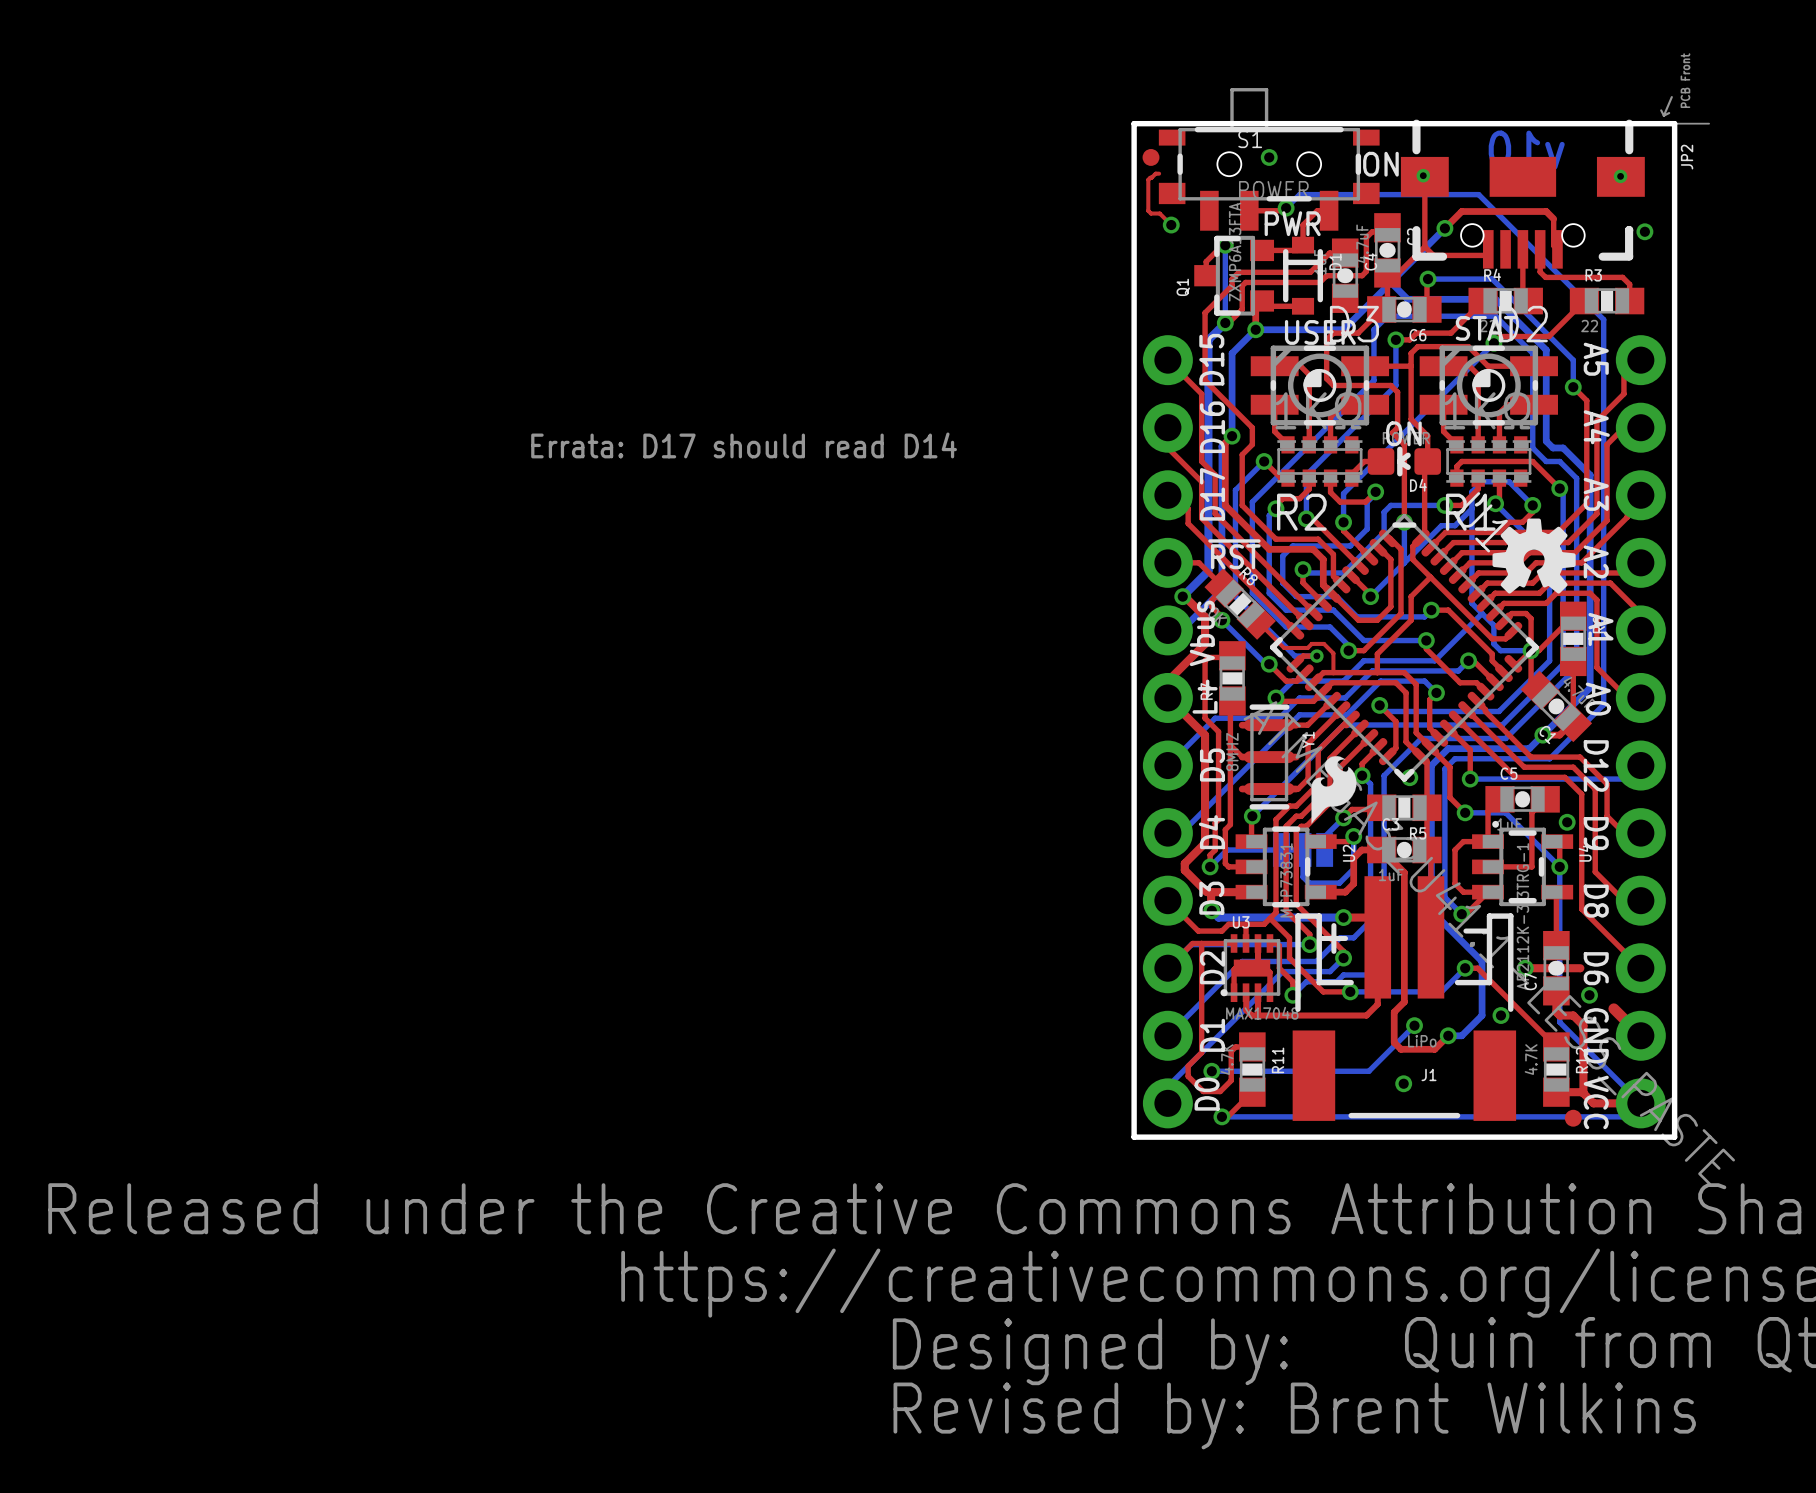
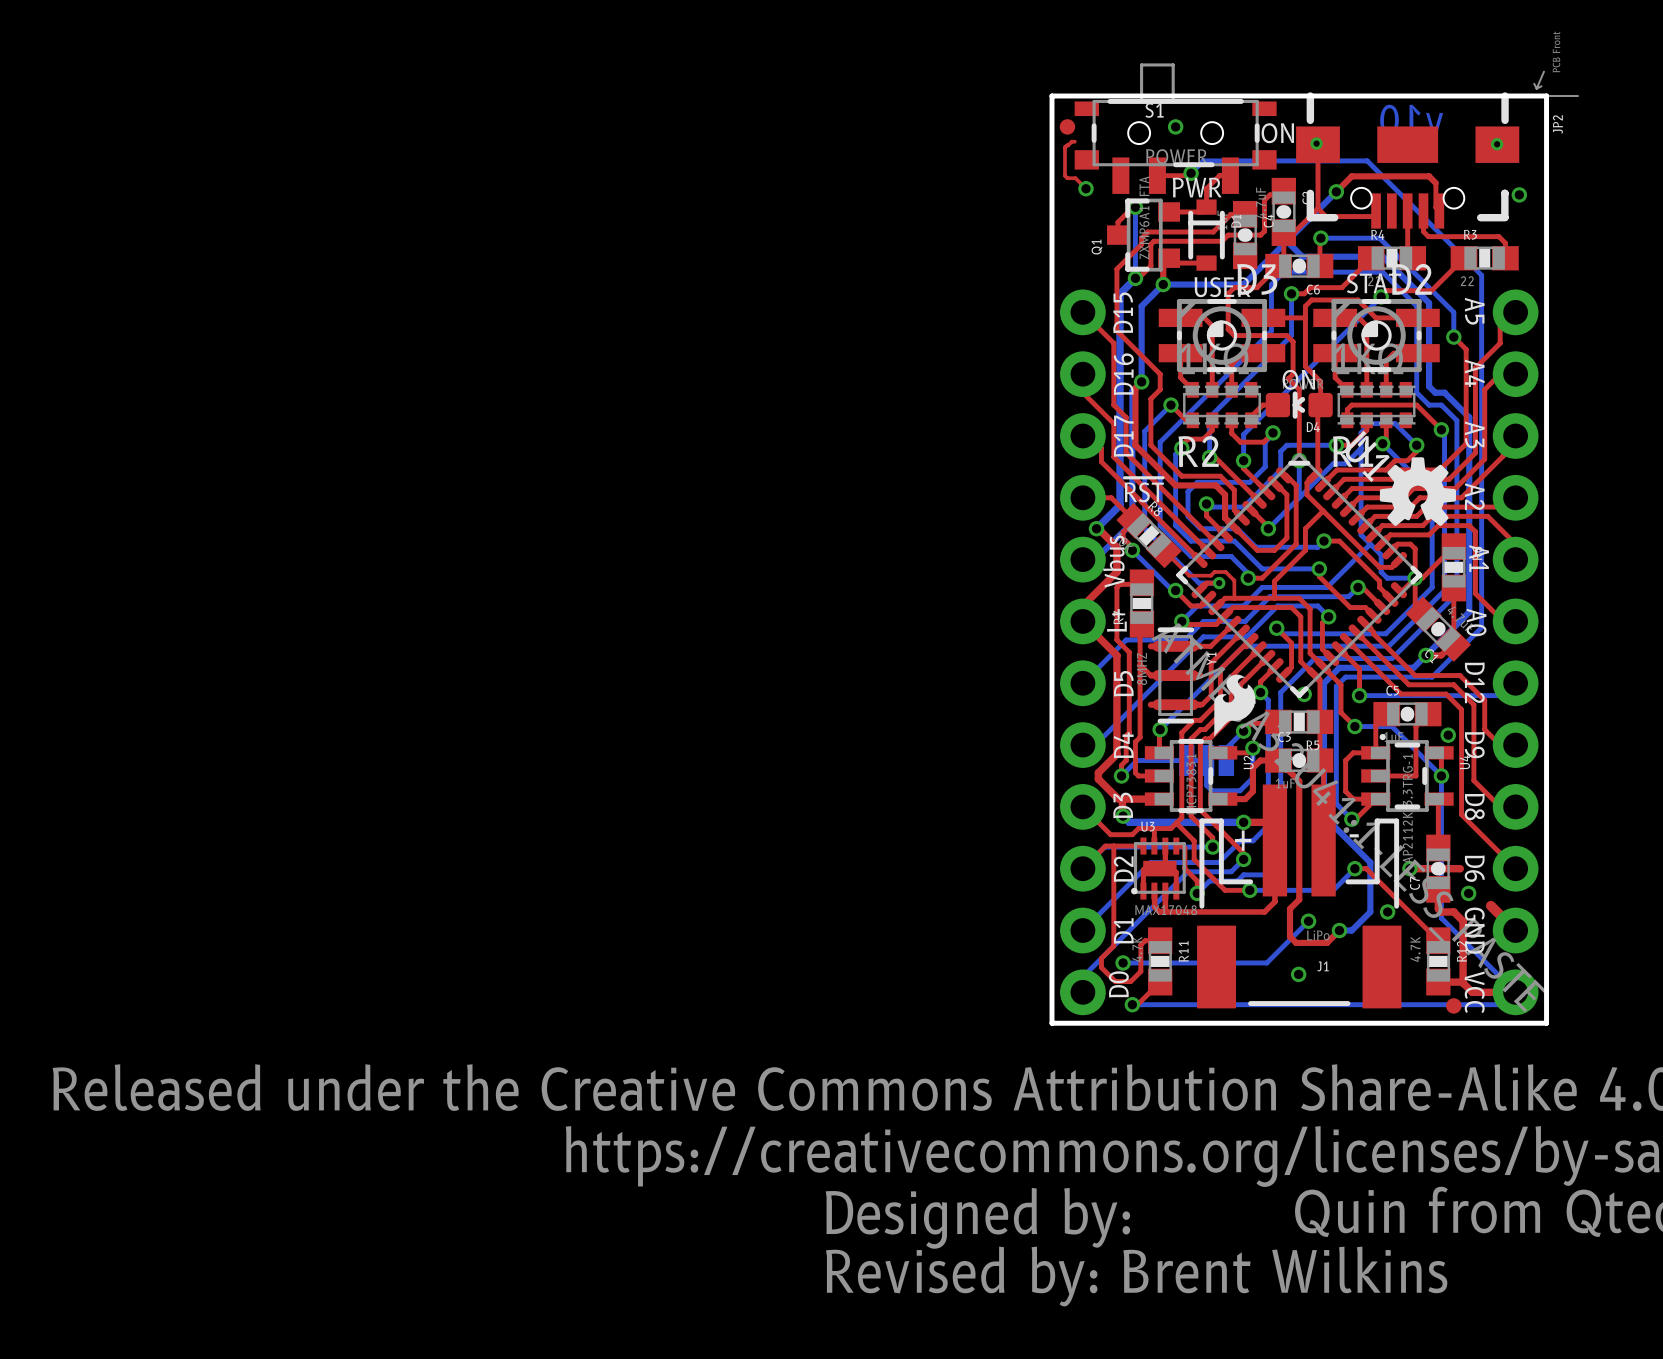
text: Errata: D17 should read D14 (744, 445) -> none

